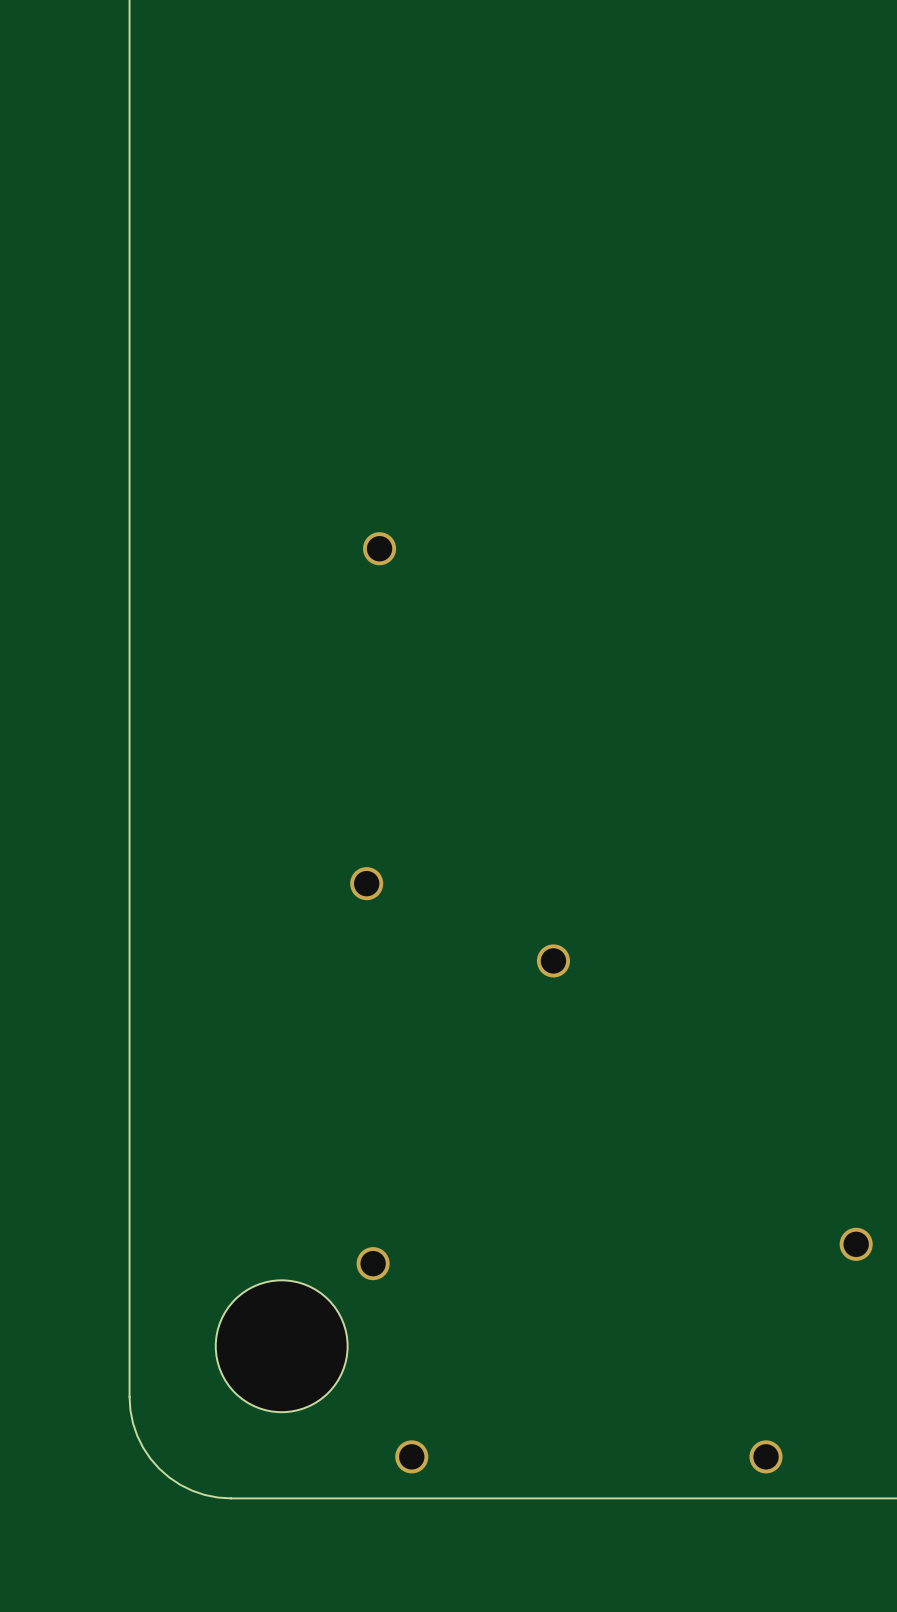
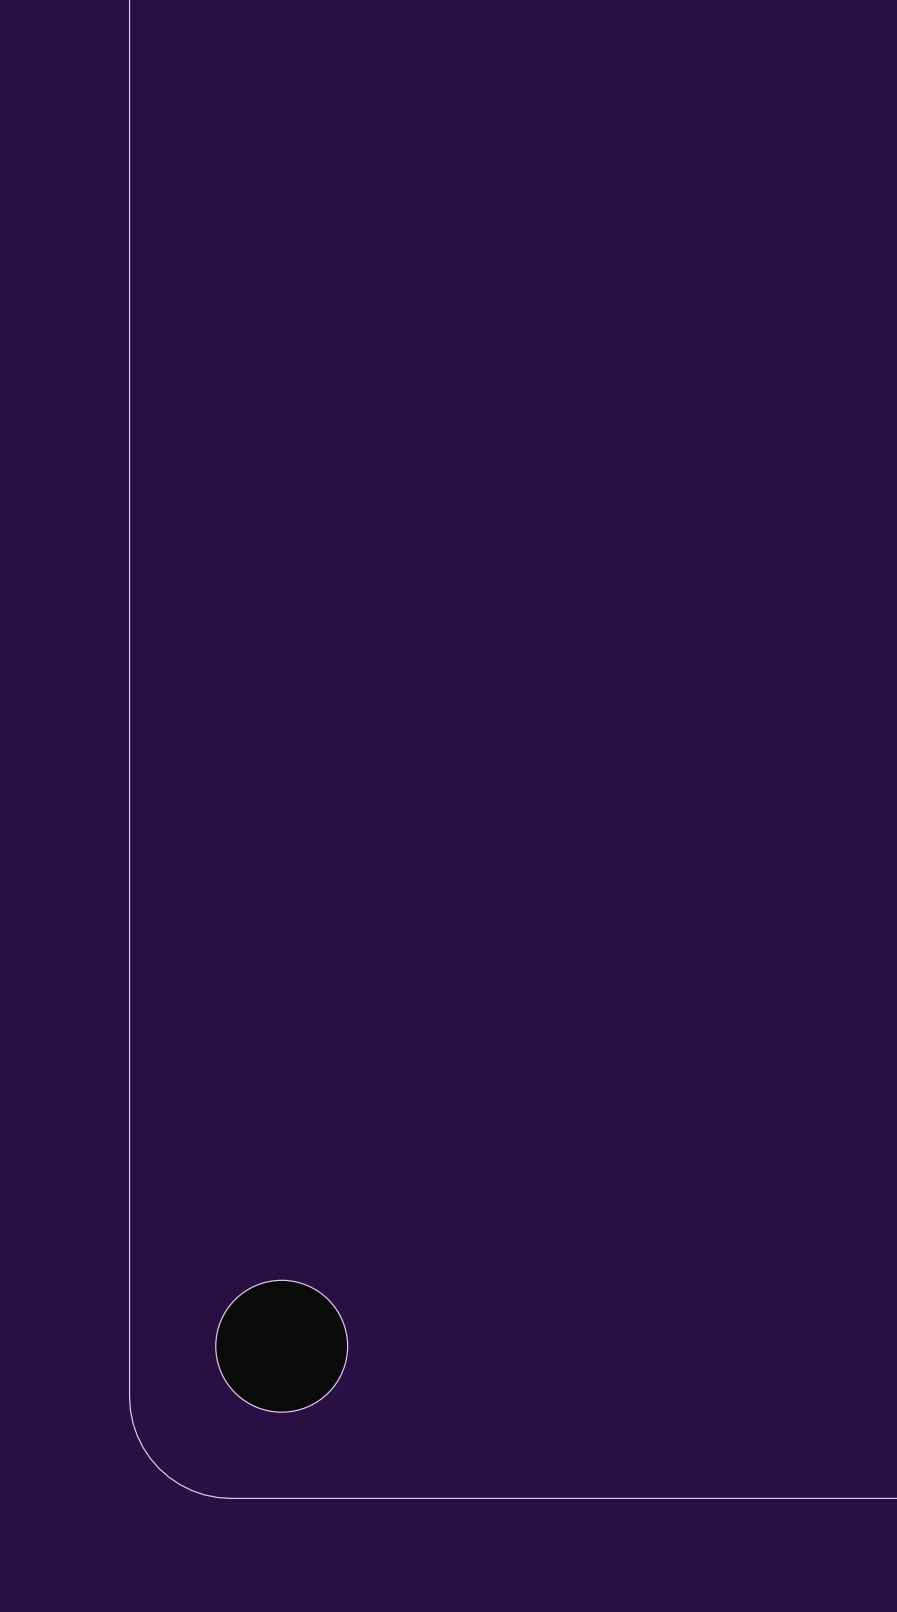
via: (379, 548) -> none
via: (366, 883) -> none
via: (553, 960) -> none
via: (856, 1244) -> none
via: (373, 1263) -> none
via: (411, 1456) -> none
via: (766, 1456) -> none

